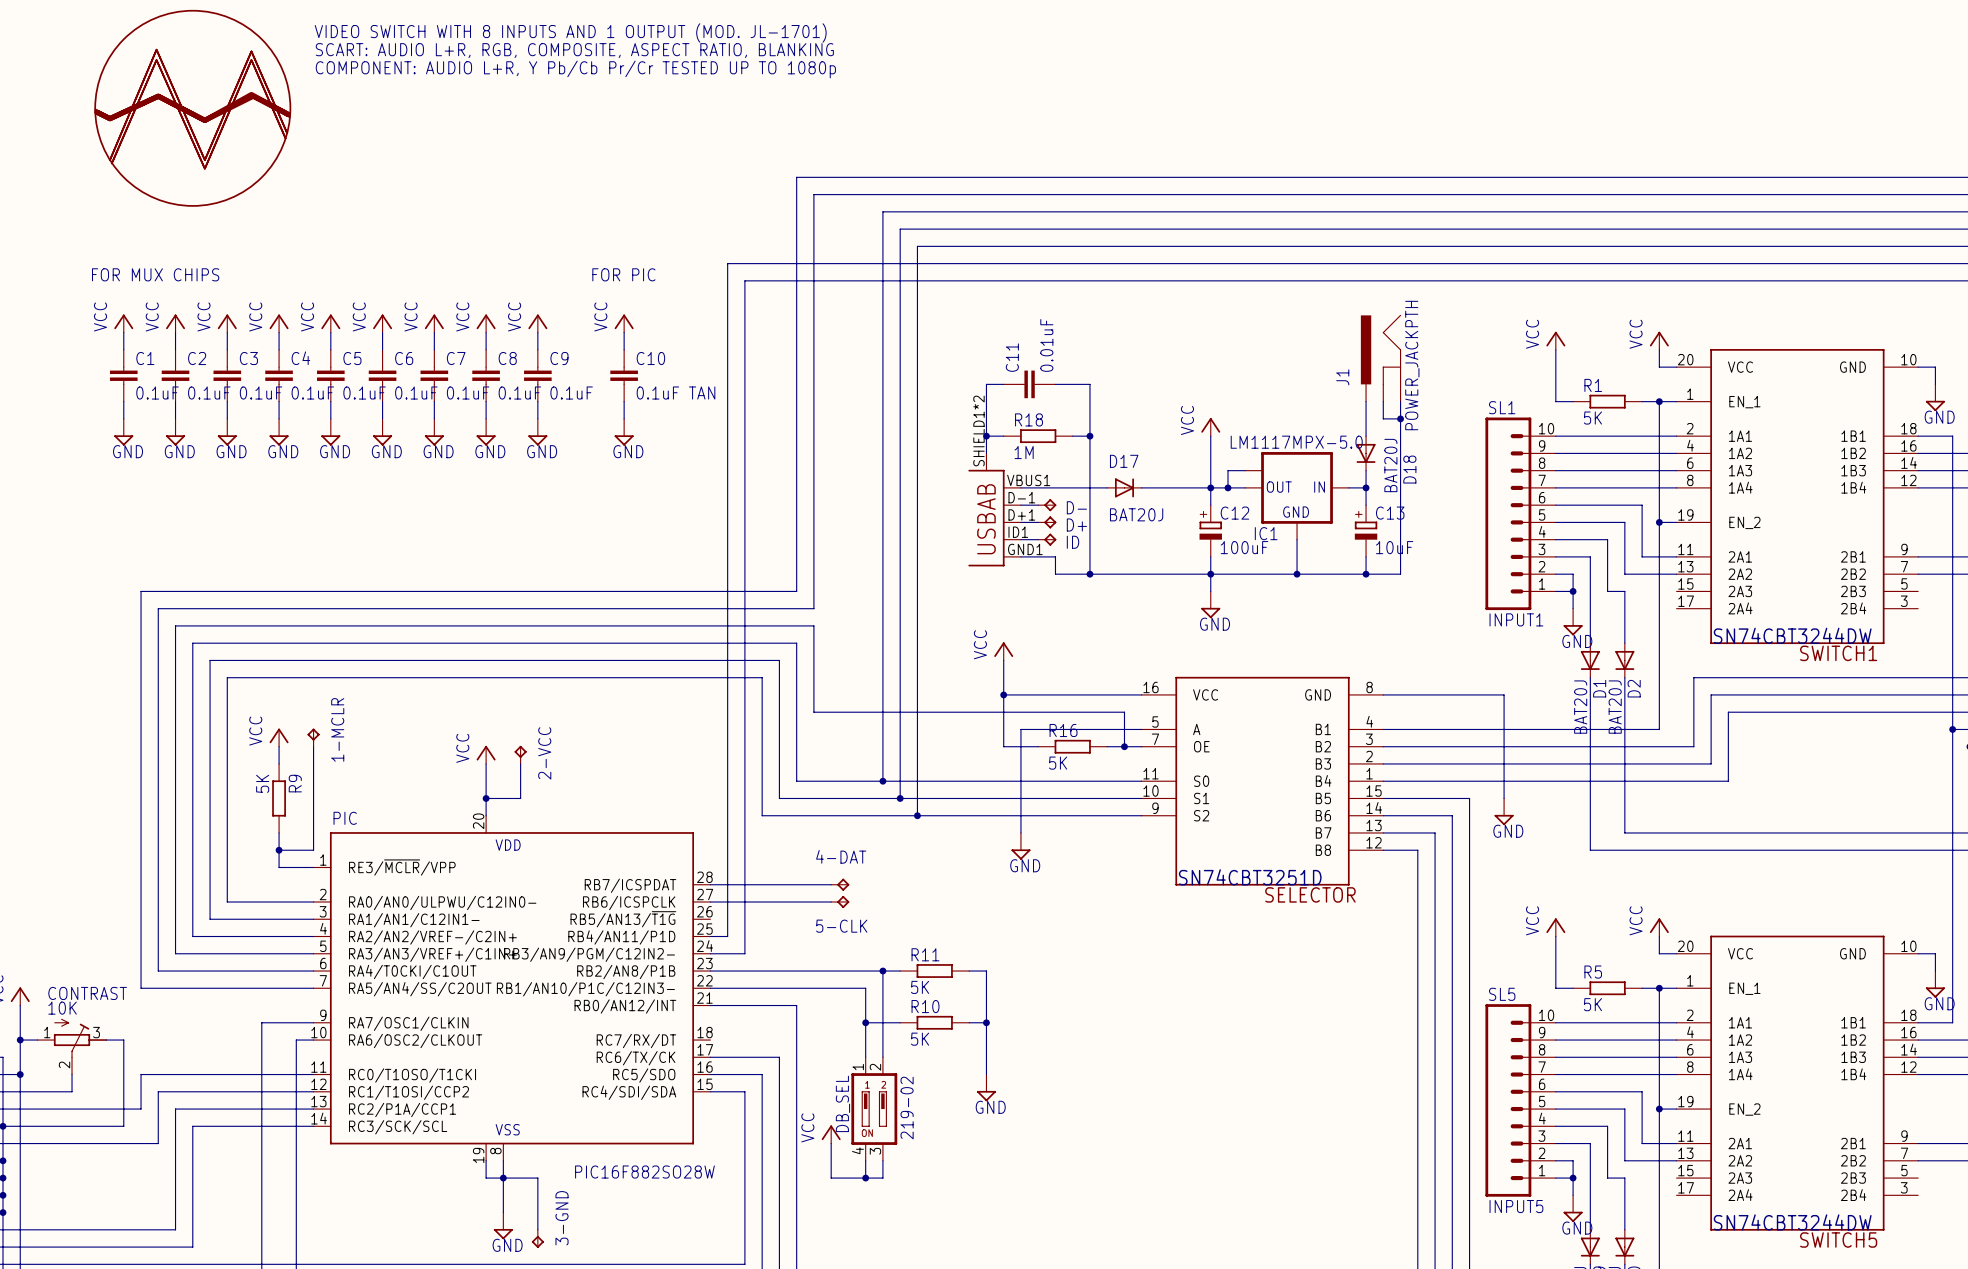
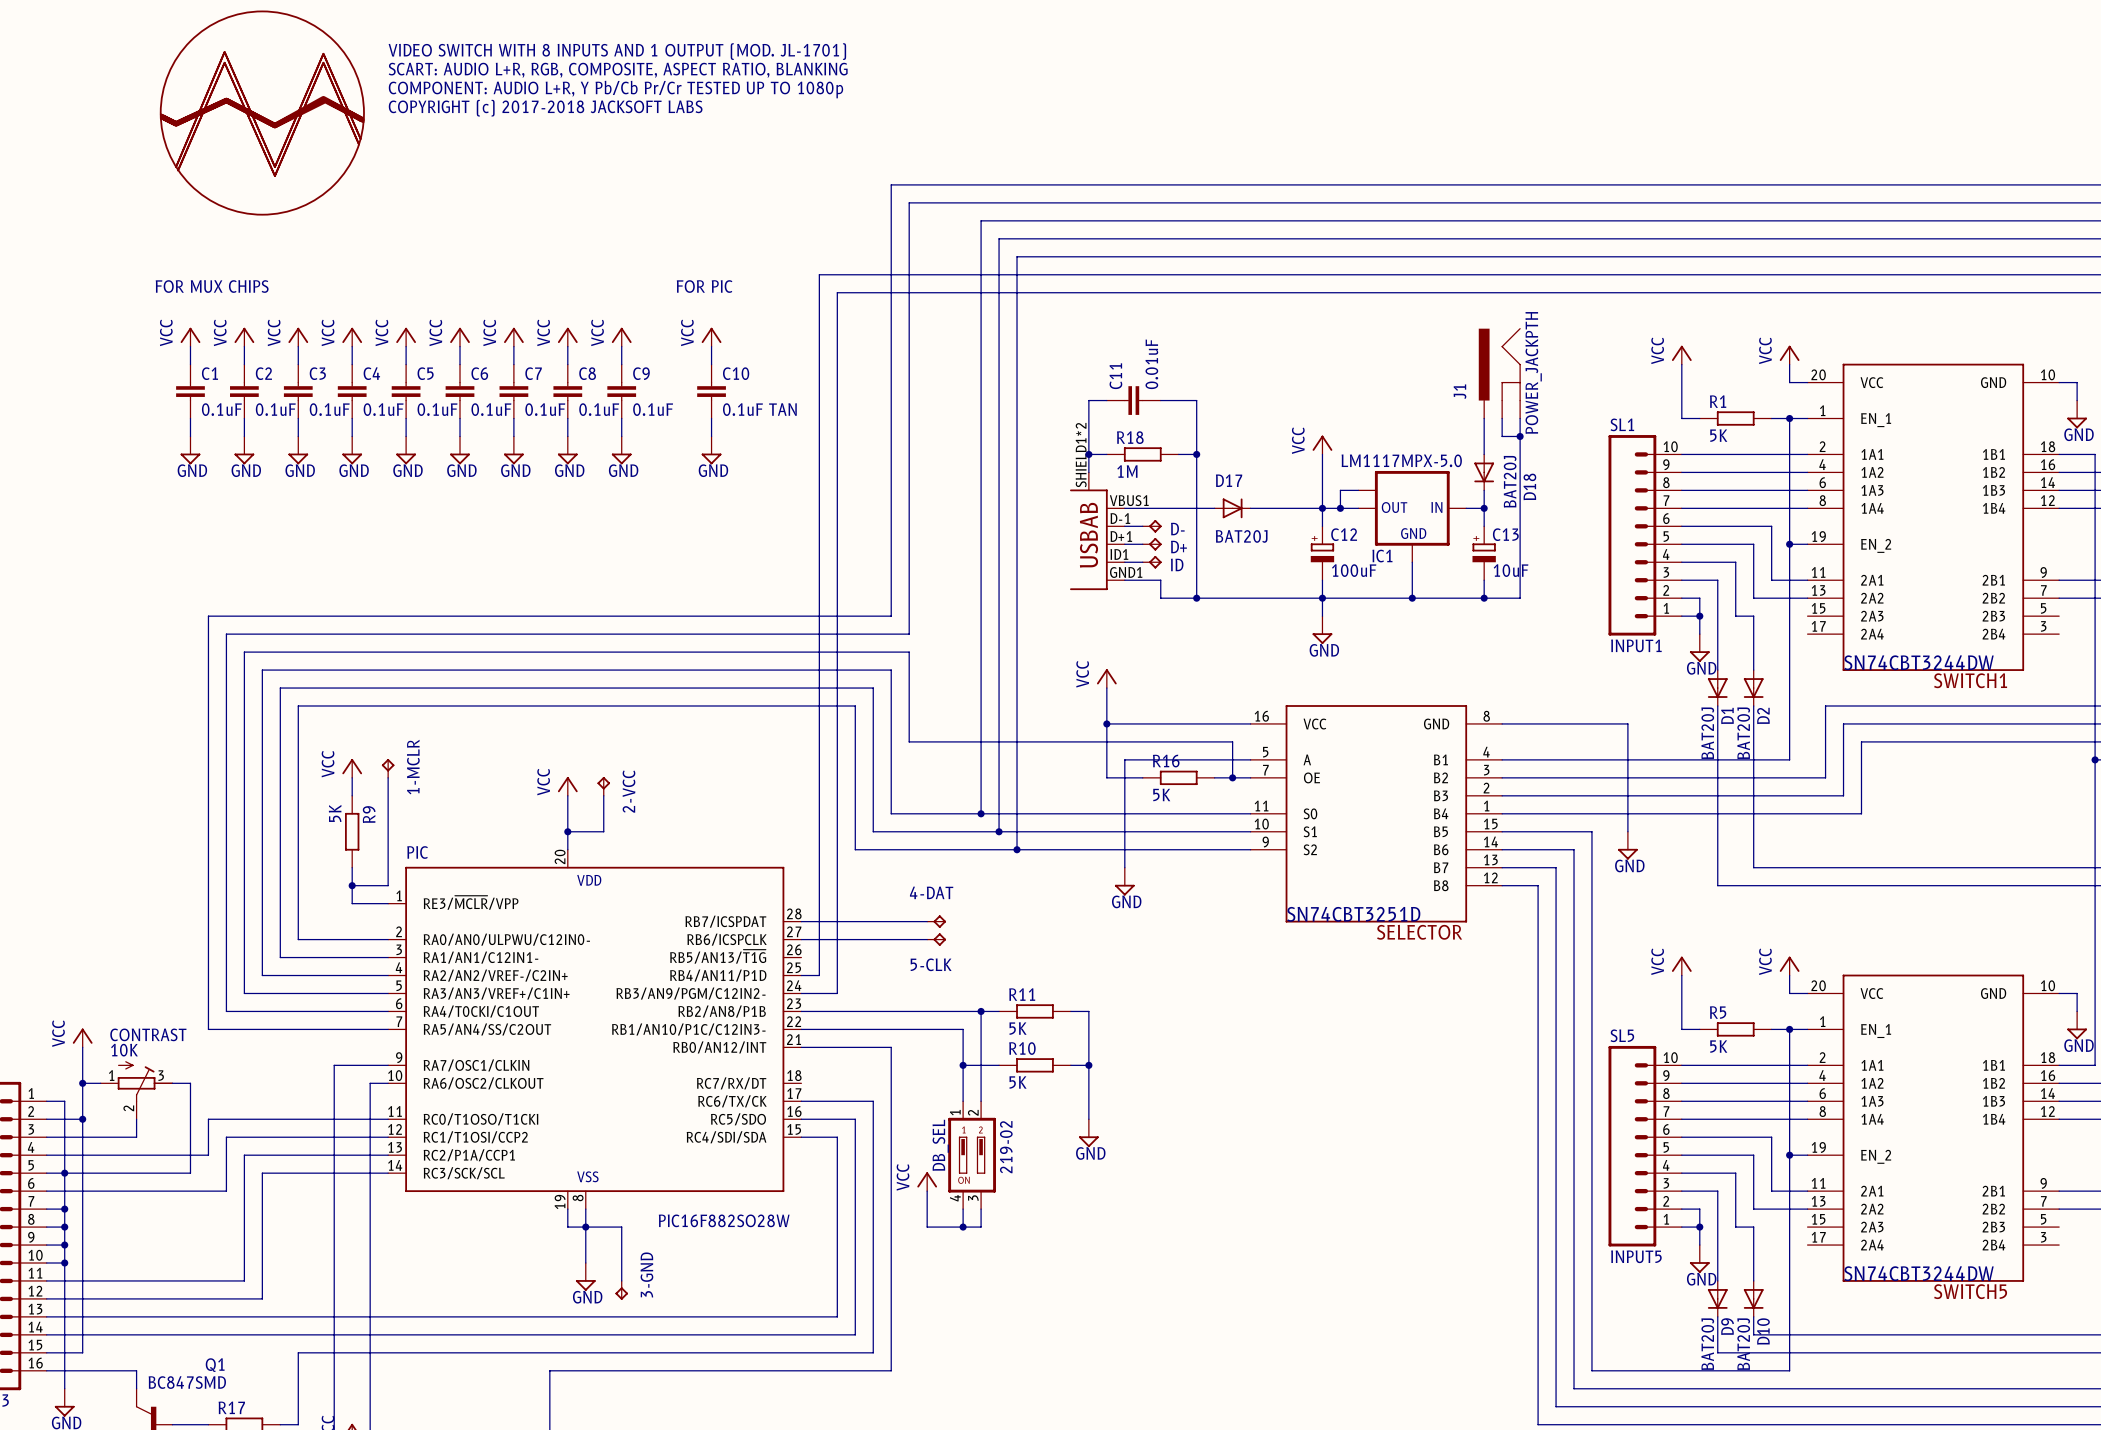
text: VIDEO SWITCH WITH 8 INPUTS AND 1 OUTPUT (MOD. JL-1701) (570, 32) -> none
text: SCART: AUDIO L+R, RGB, COMPOSITE, ASPECT RATIO, BLANKING (574, 50) -> VIDEO SWITCH WITH 8 INPUTS AND 1 OUTPUT (MOD. JL-1701) (617, 51)
text: COMPONENT: AUDIO L+R, Y Pb/Cb Pr/Cr TESTED UP TO 1080p (575, 69) -> SCART: AUDIO L+R, RGB, COMPOSITE, ASPECT RATIO, BLANKING (618, 70)
text: none -> COMPONENT: AUDIO L+R, Y Pb/Cb Pr/Cr TESTED UP TO 1080p (615, 89)
text: none -> COPYRIGHT (c) 2017-2018 JACKSOFT LABS (545, 108)

